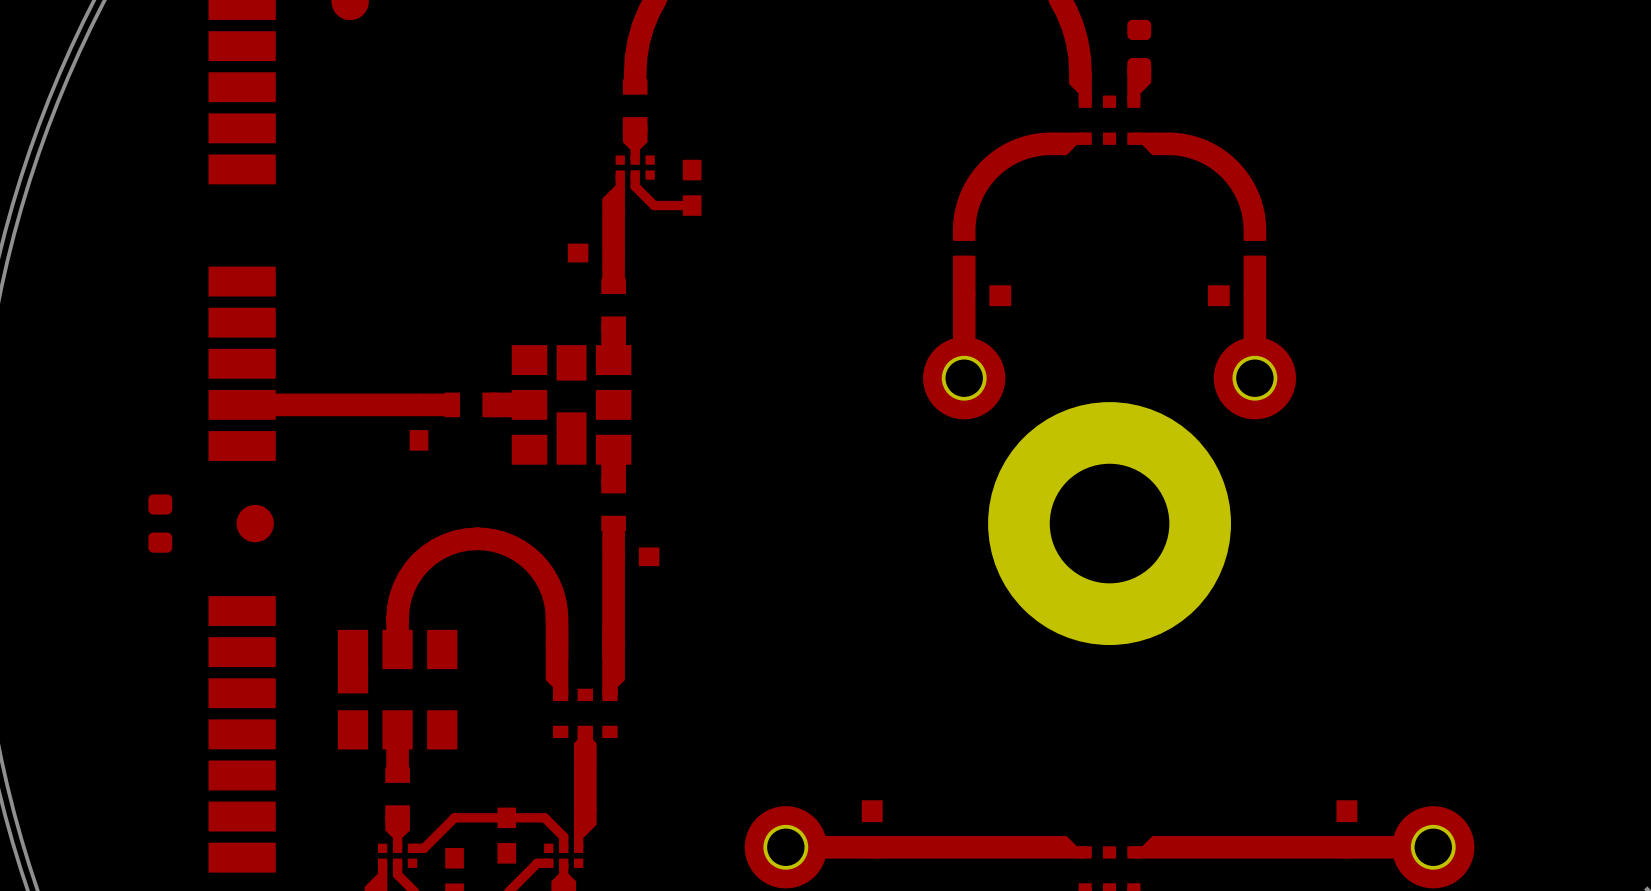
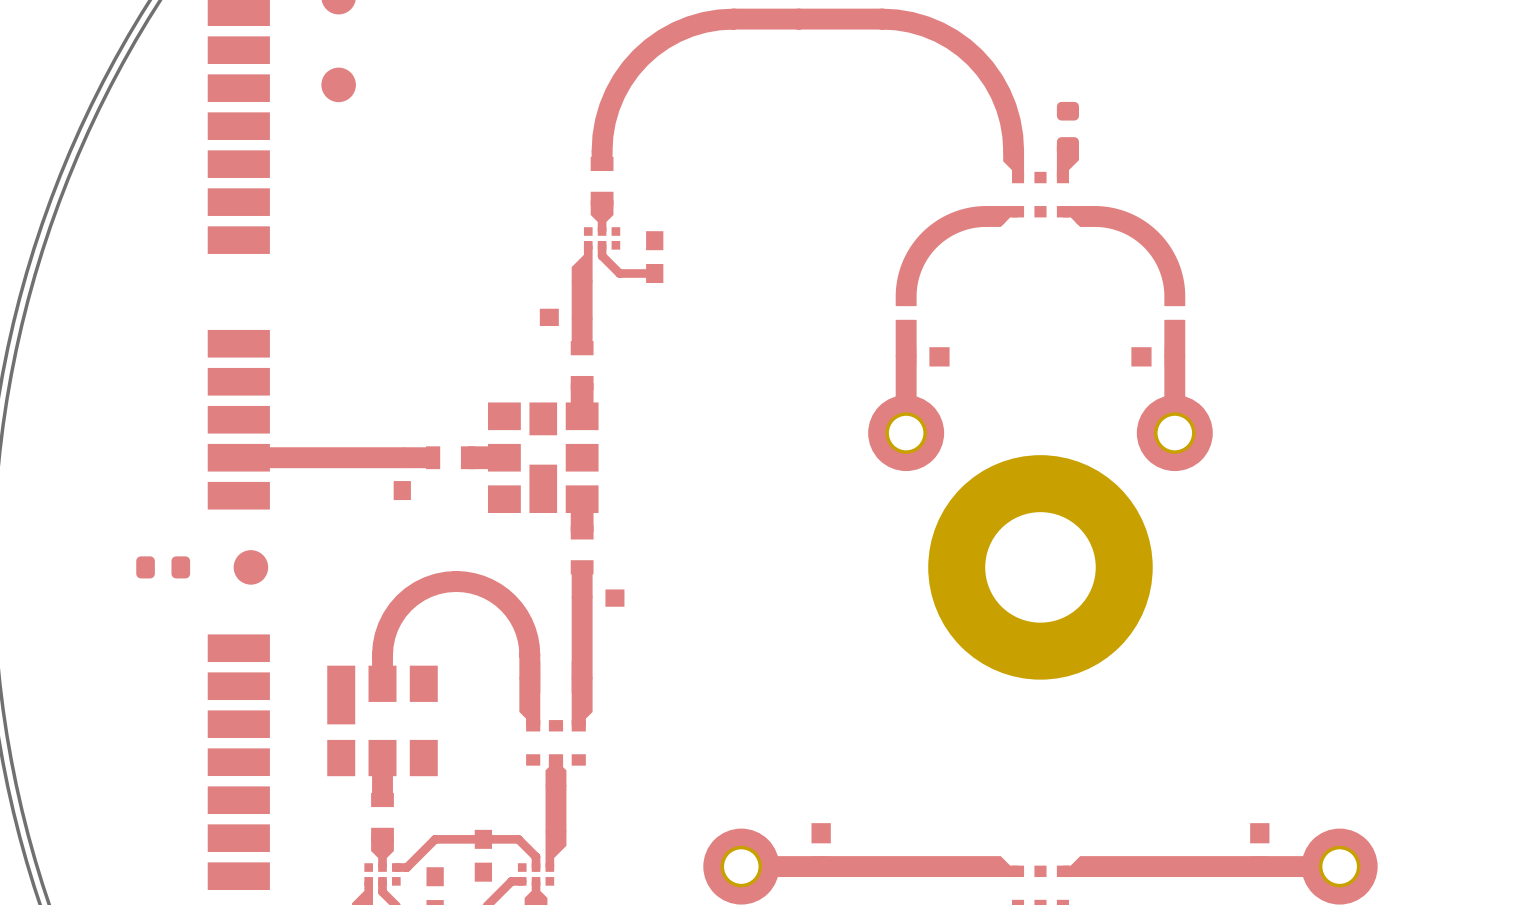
part rotation: 0° (160, 523) -> 90° clockwise (163, 567)

